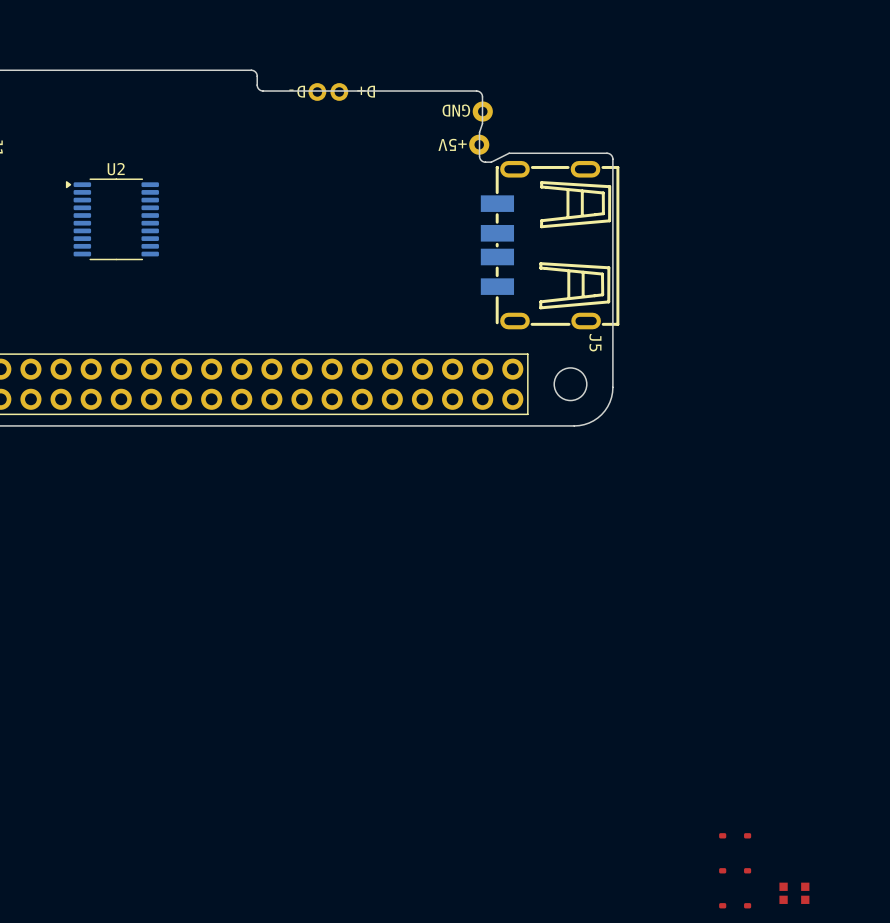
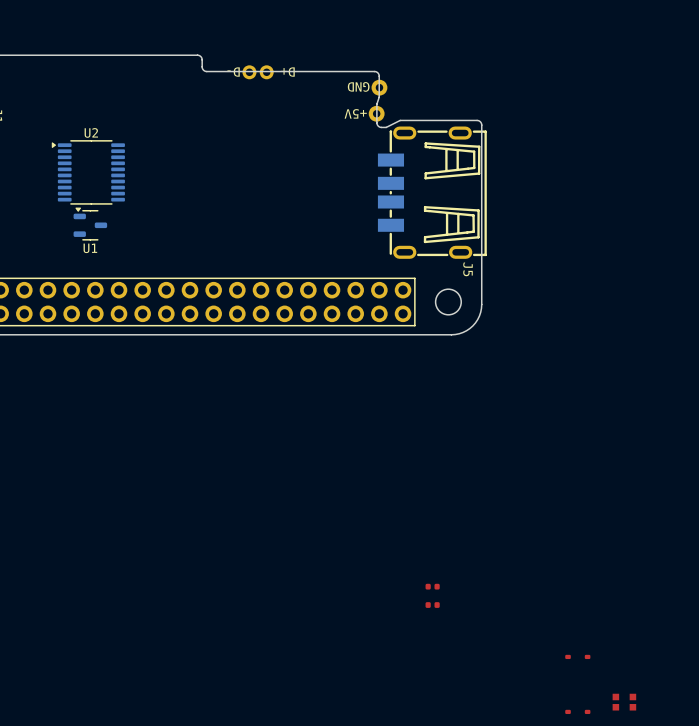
U1: none -> (90, 223)
part: none -> (432, 586)
part: none -> (432, 605)
part: (735, 870) -> none

